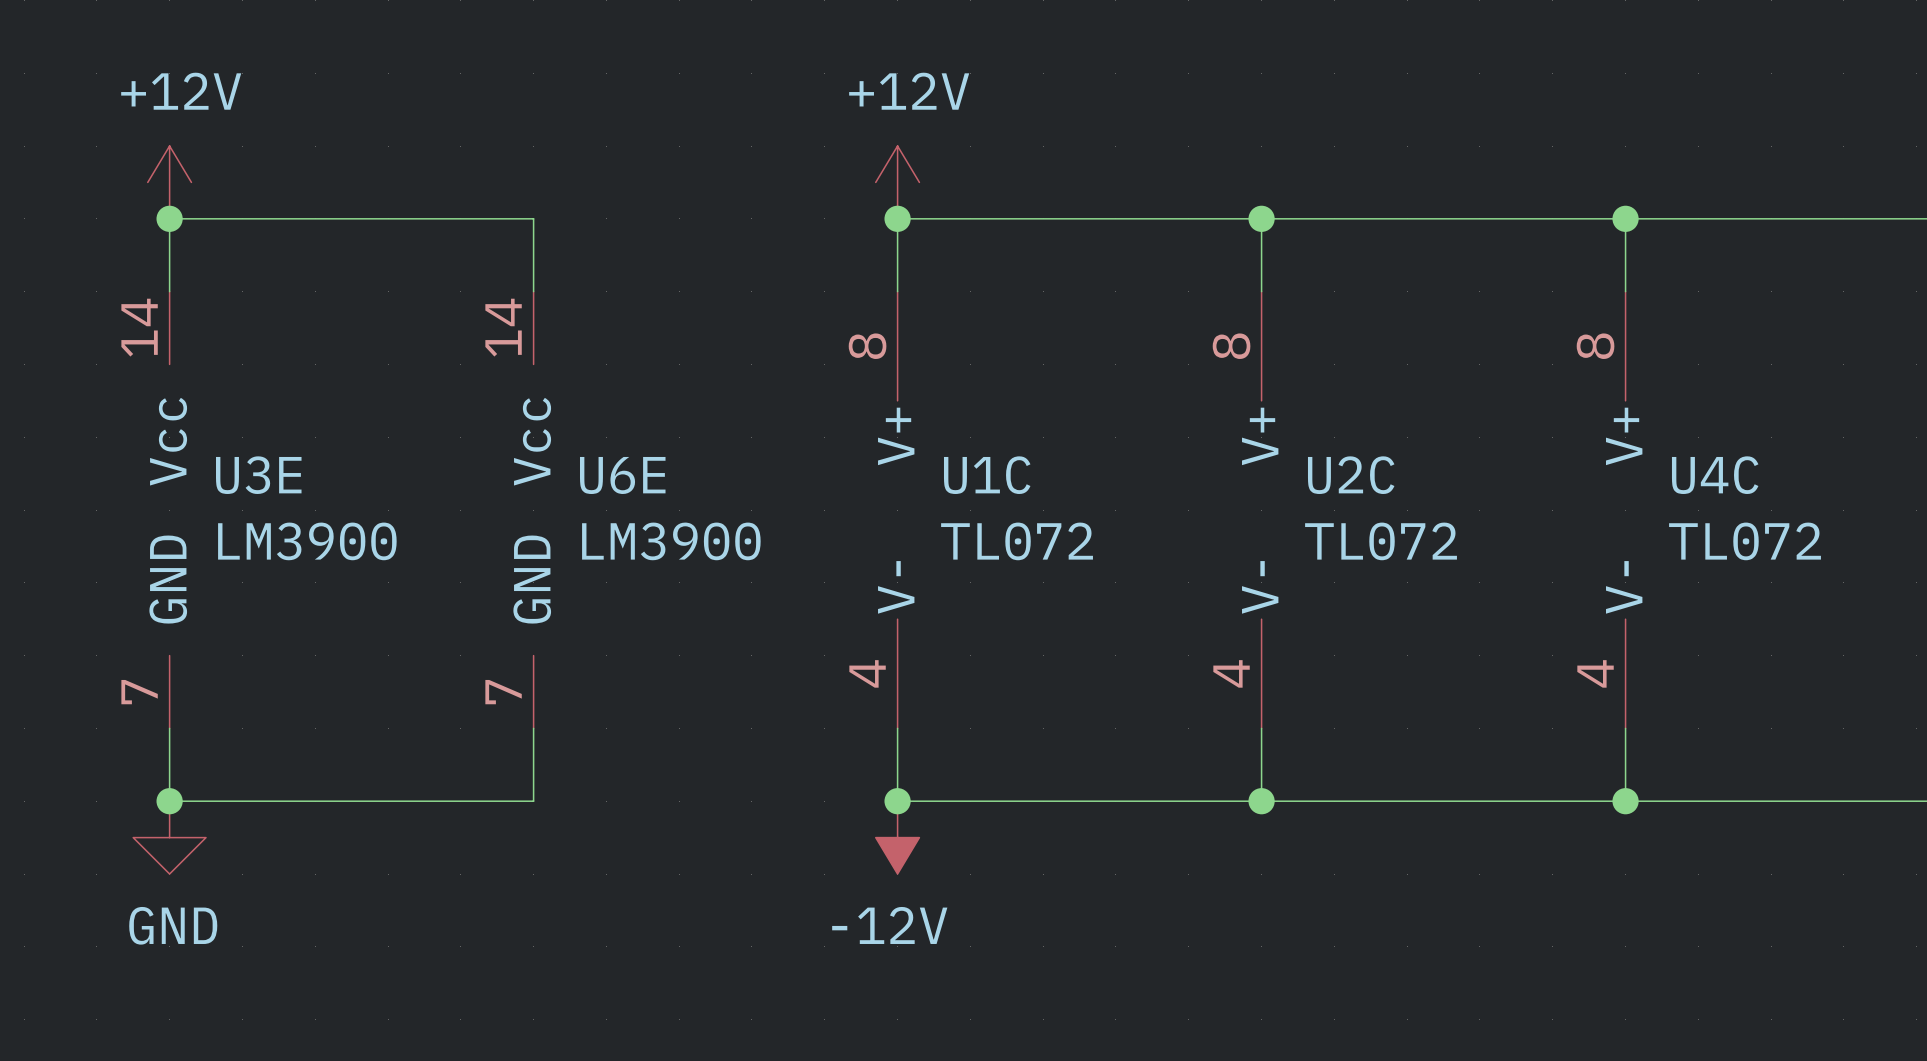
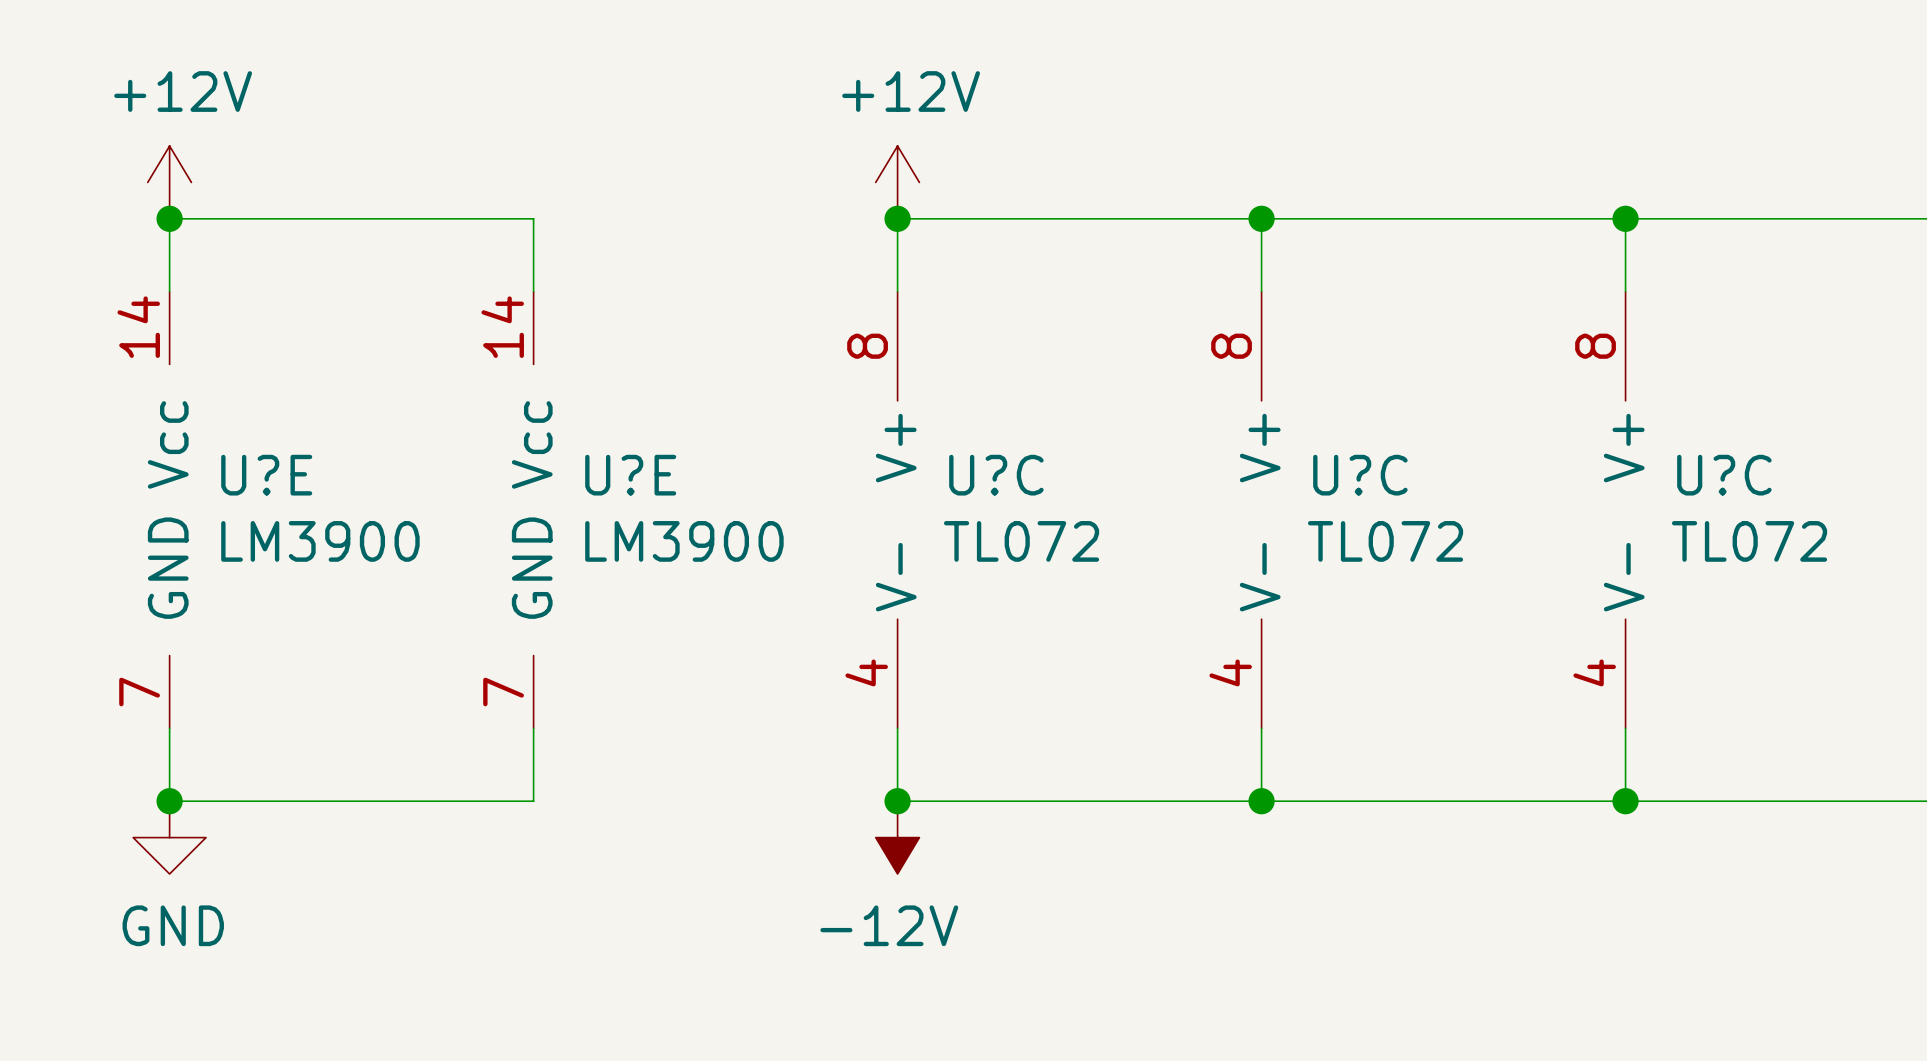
U3E name: U3E (258, 475) -> U?E (266, 475)
U6E name: U6E (622, 475) -> U?E (630, 475)
U1C name: U1C (987, 475) -> U?C (996, 475)
U2C name: U2C (1351, 475) -> U?C (1360, 475)
U4C name: U4C (1715, 475) -> U?C (1724, 475)

